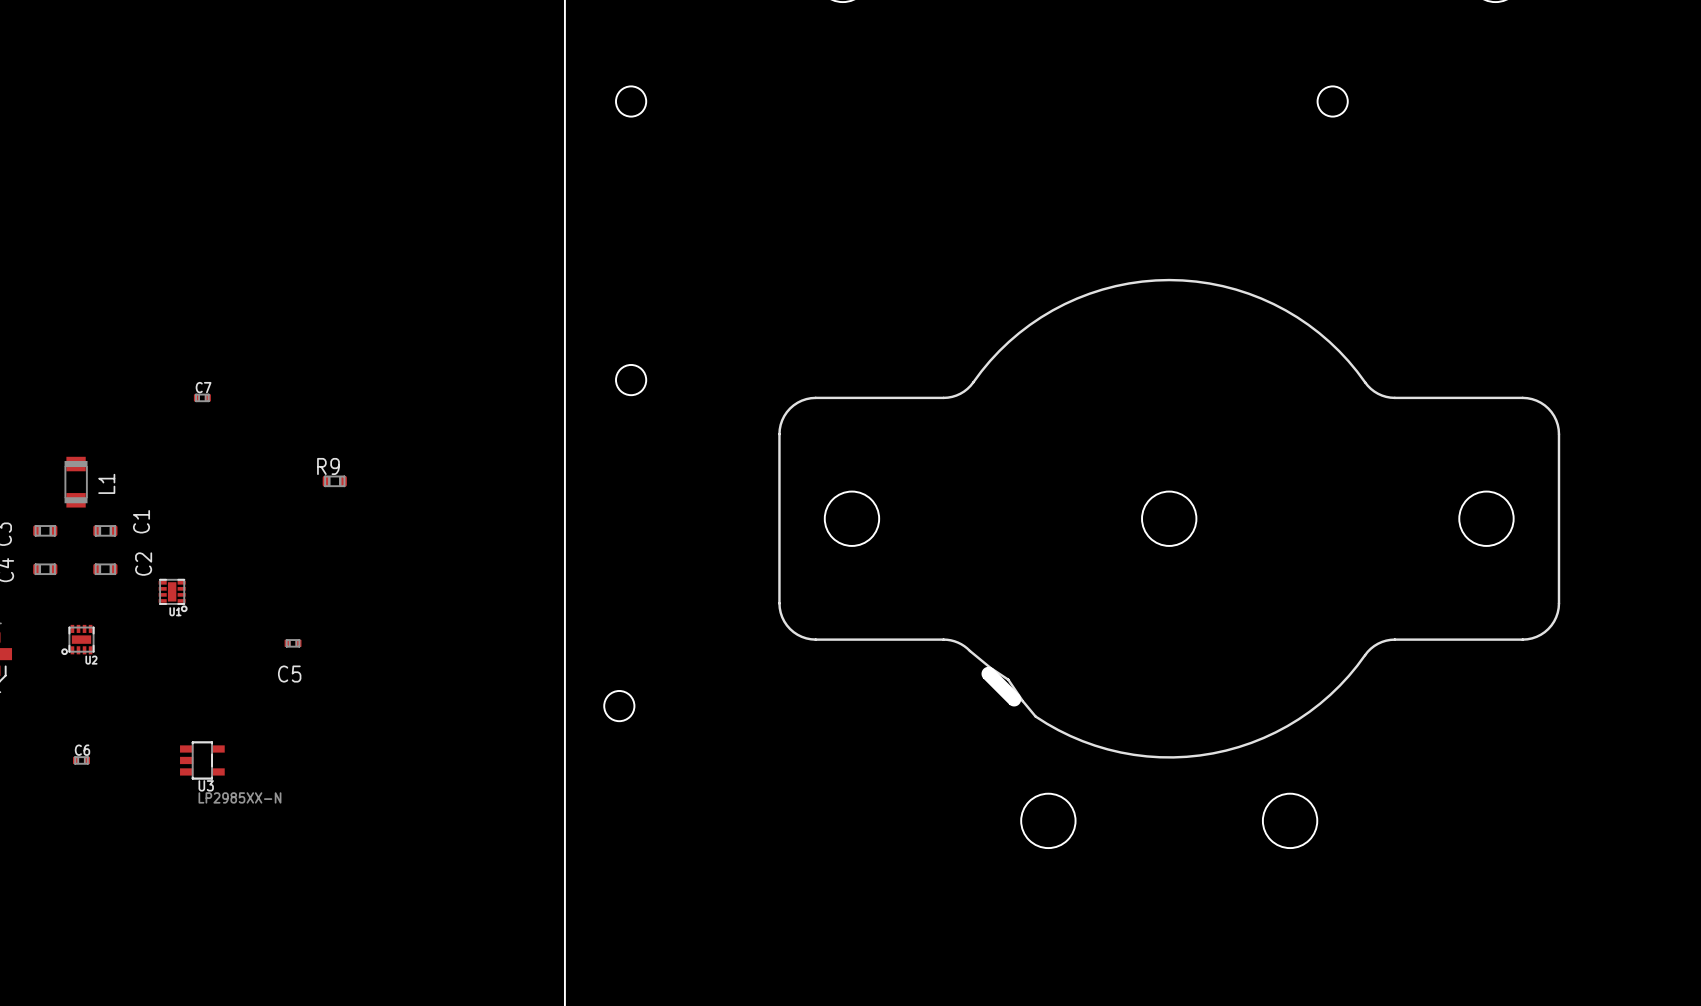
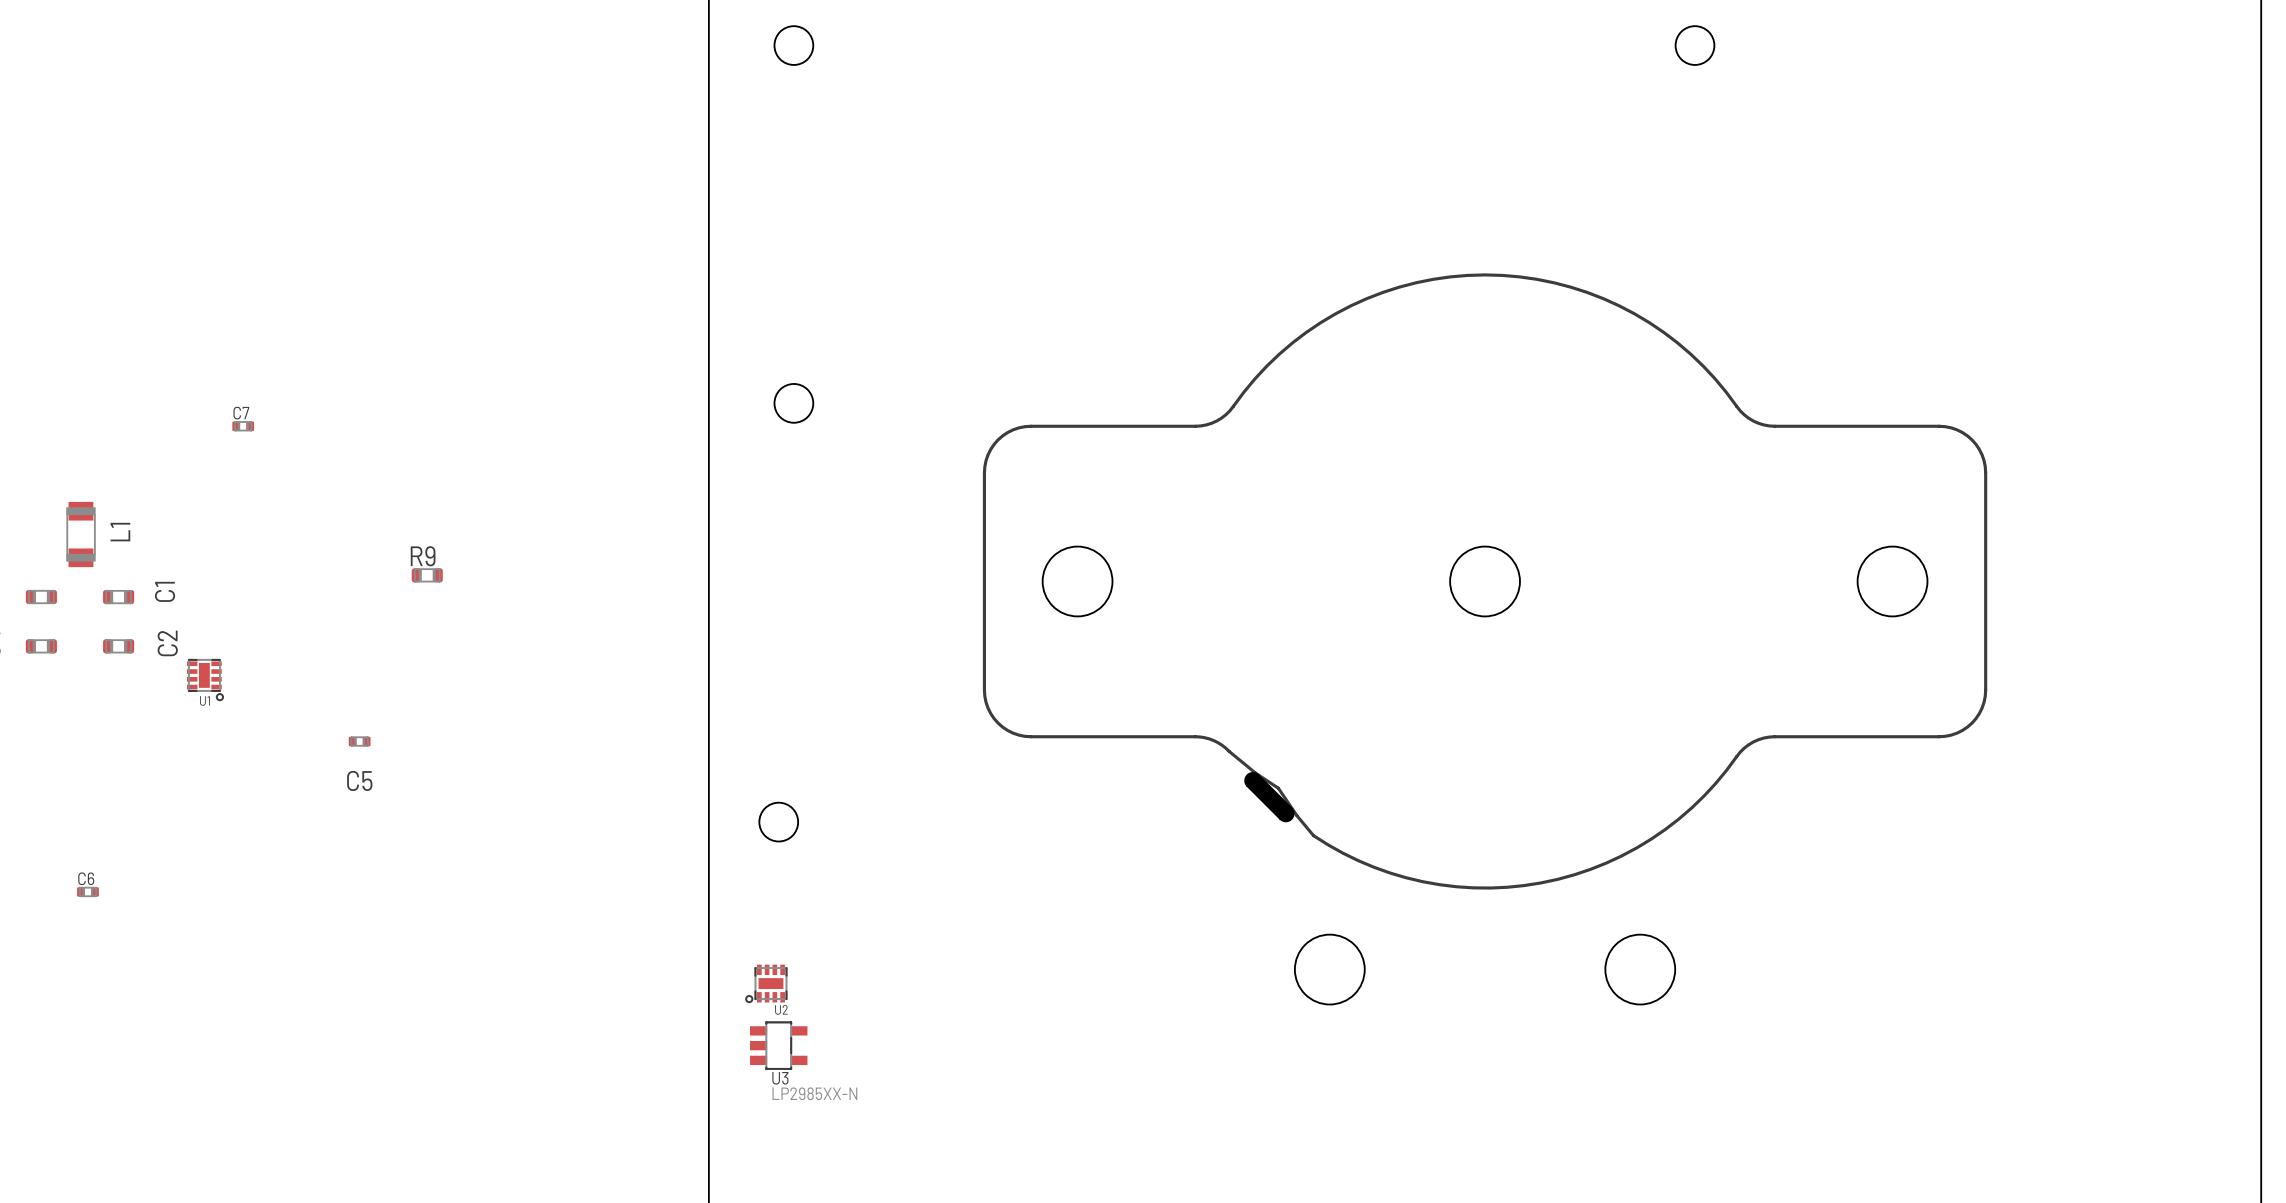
R9 position: (334, 481) -> (427, 575)
U2 position: (77, 639) -> (766, 983)
U3 position: (202, 760) -> (778, 1045)

